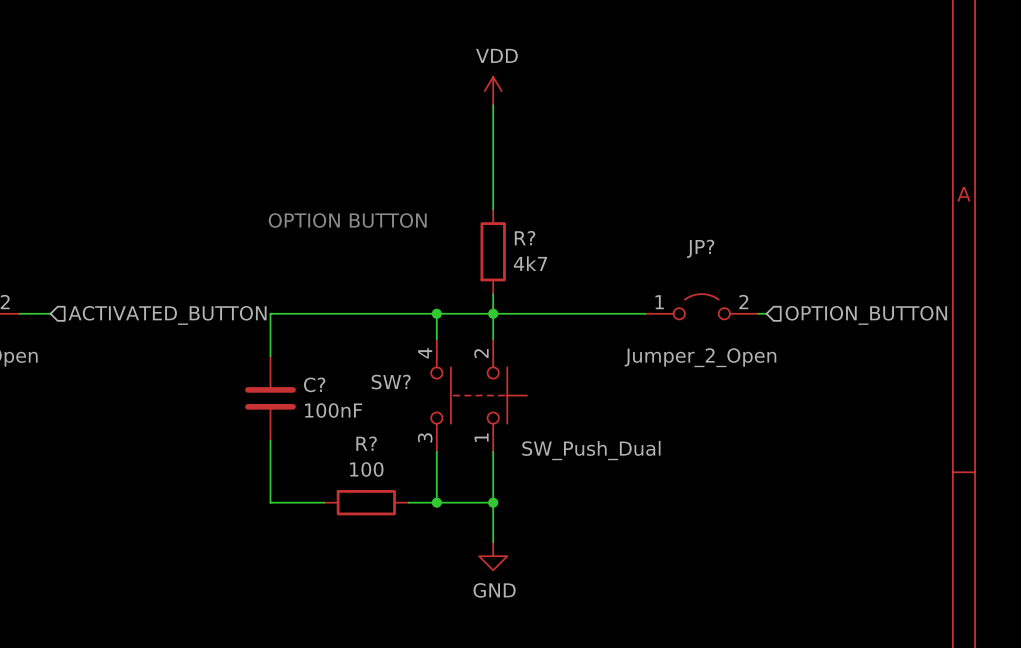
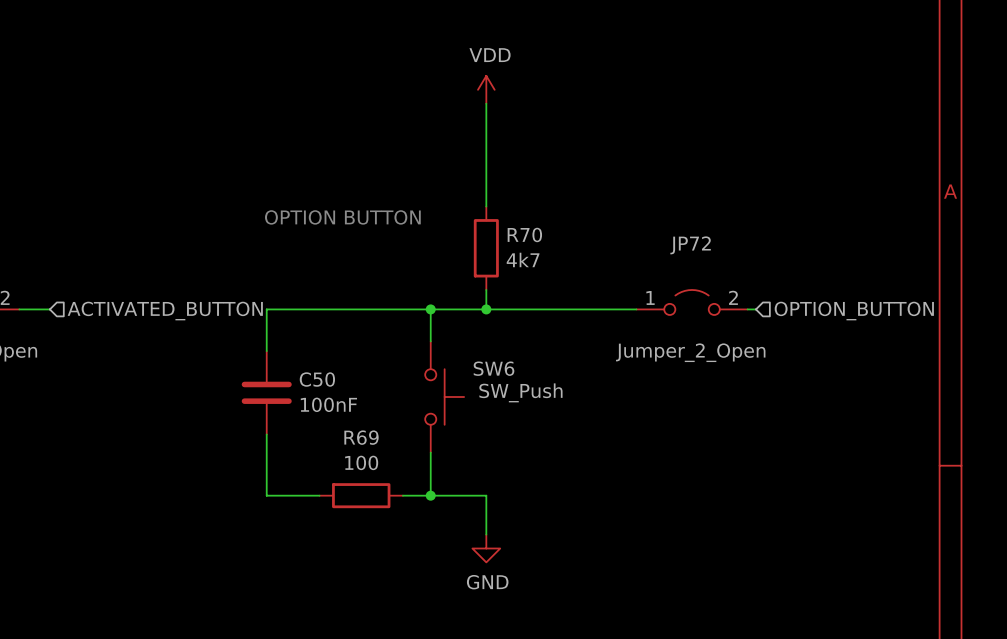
R? name: R? (525, 238) -> R70 (524, 234)
JP? name: JP? (700, 248) -> JP72 (690, 245)
wire: (493, 313) (493, 339) -> none
C? name: C? (314, 384) -> C50 (317, 379)
SW?: SW_Push_Dual (479, 395) -> none
SW6: none -> SW_Push (444, 396)
R? name: R? (366, 443) -> R69 (361, 437)
wire: (493, 451) (493, 502) -> none
junction: (493, 502) -> none

